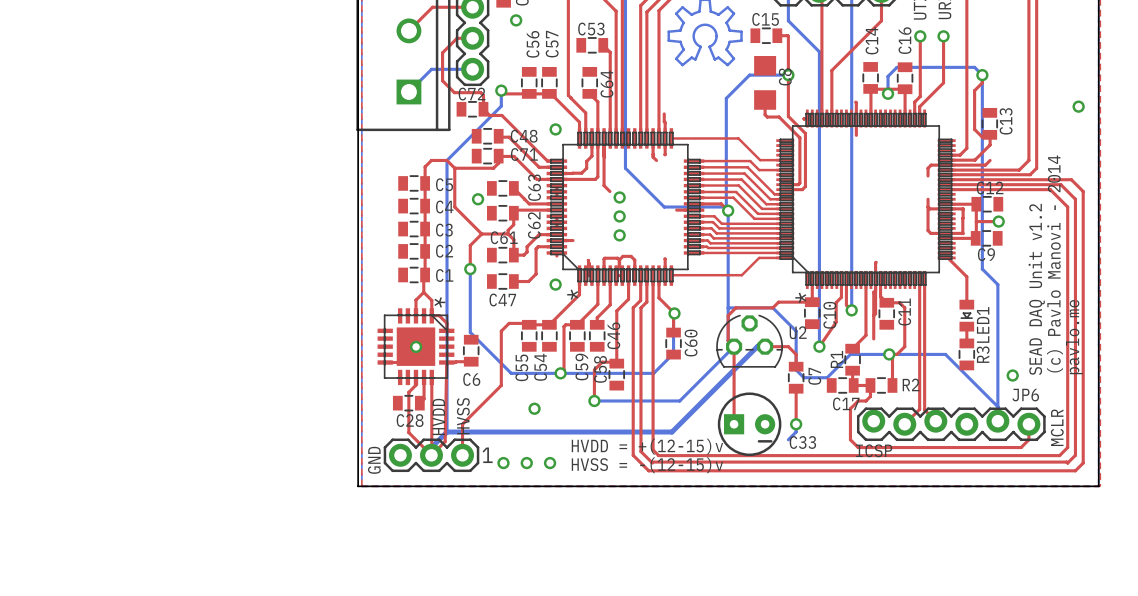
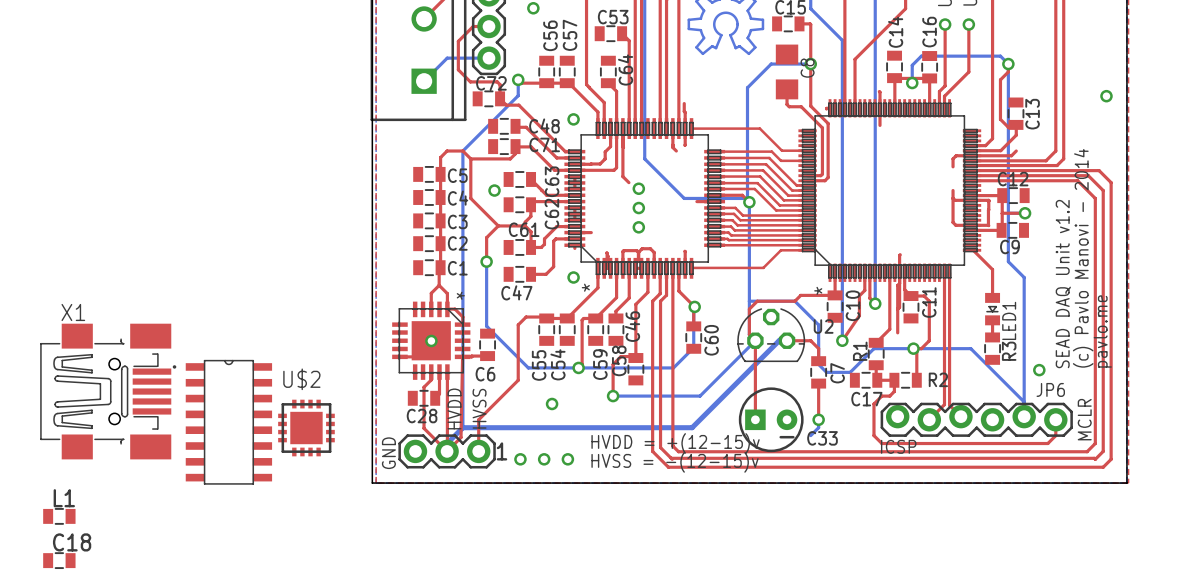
X1: none -> (105, 391)
part: none -> (222, 422)
U$2: none -> (306, 428)
L1: none -> (59, 516)
C18: none -> (59, 560)

